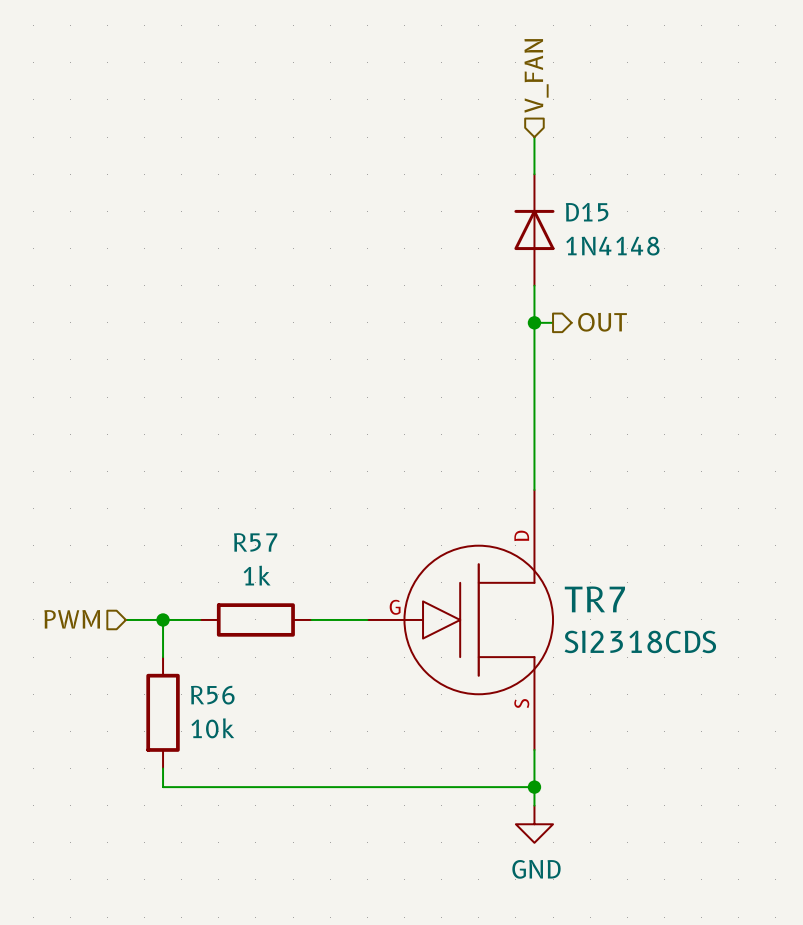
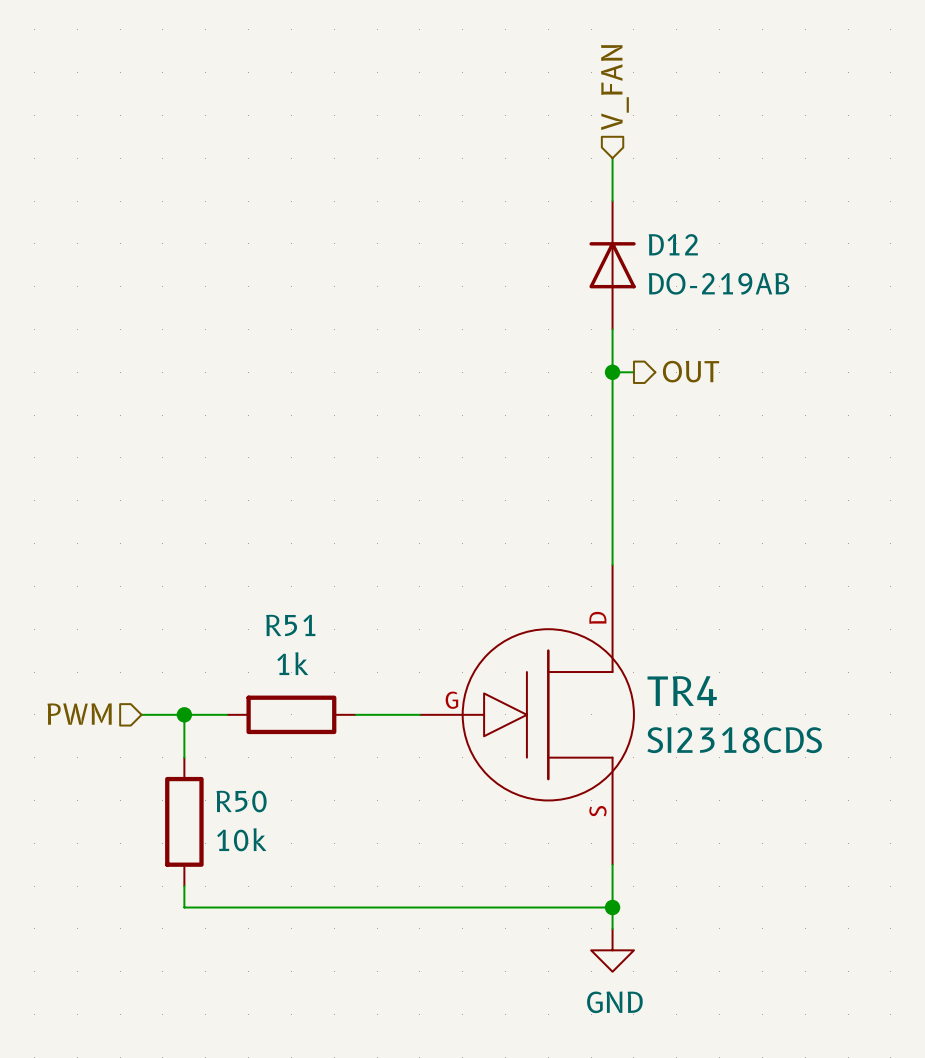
D15 name: D15 (587, 212) -> D12 (673, 244)
D15 value: 1N4148 (612, 246) -> DO-219AB (719, 283)
R57 name: R57 (255, 542) -> R51 (290, 625)
TR7 name: TR7 (594, 599) -> TR4 (682, 691)
R56 name: R56 (212, 695) -> R50 (241, 801)

